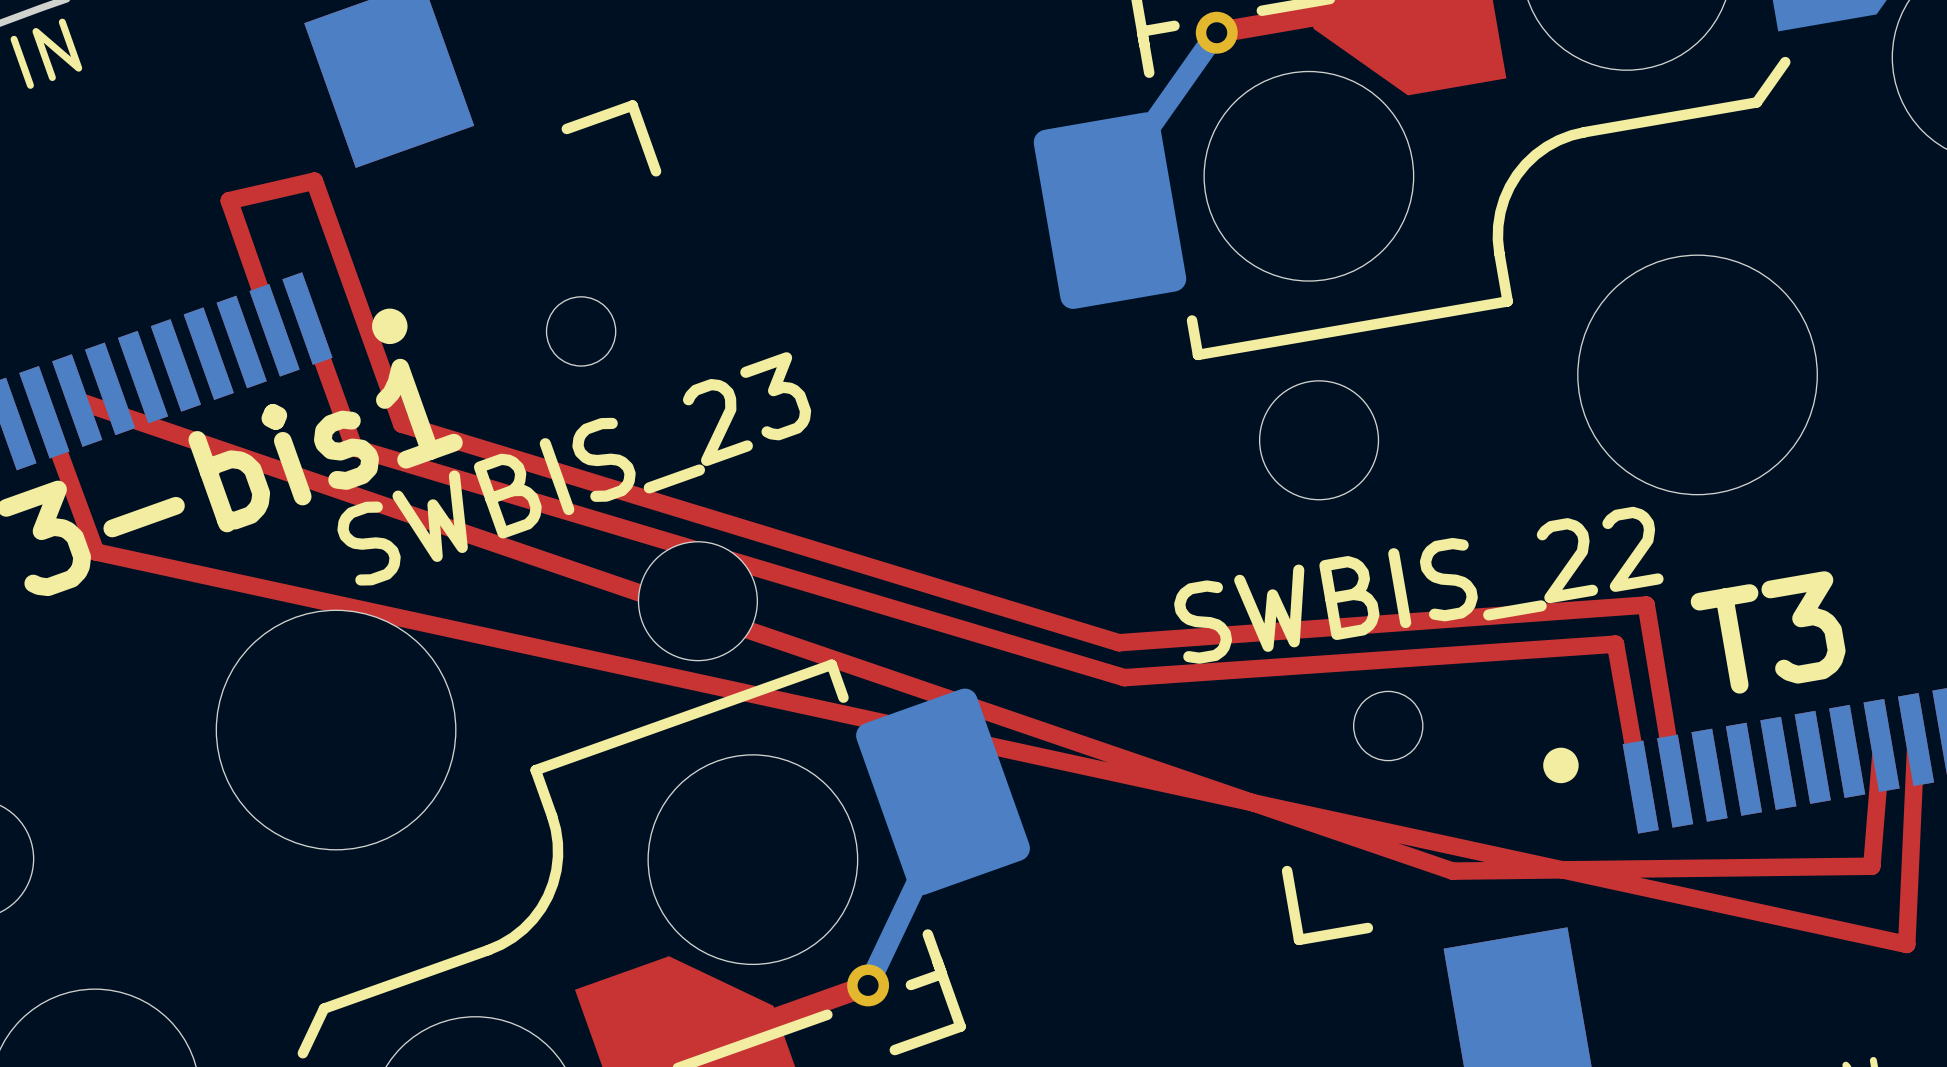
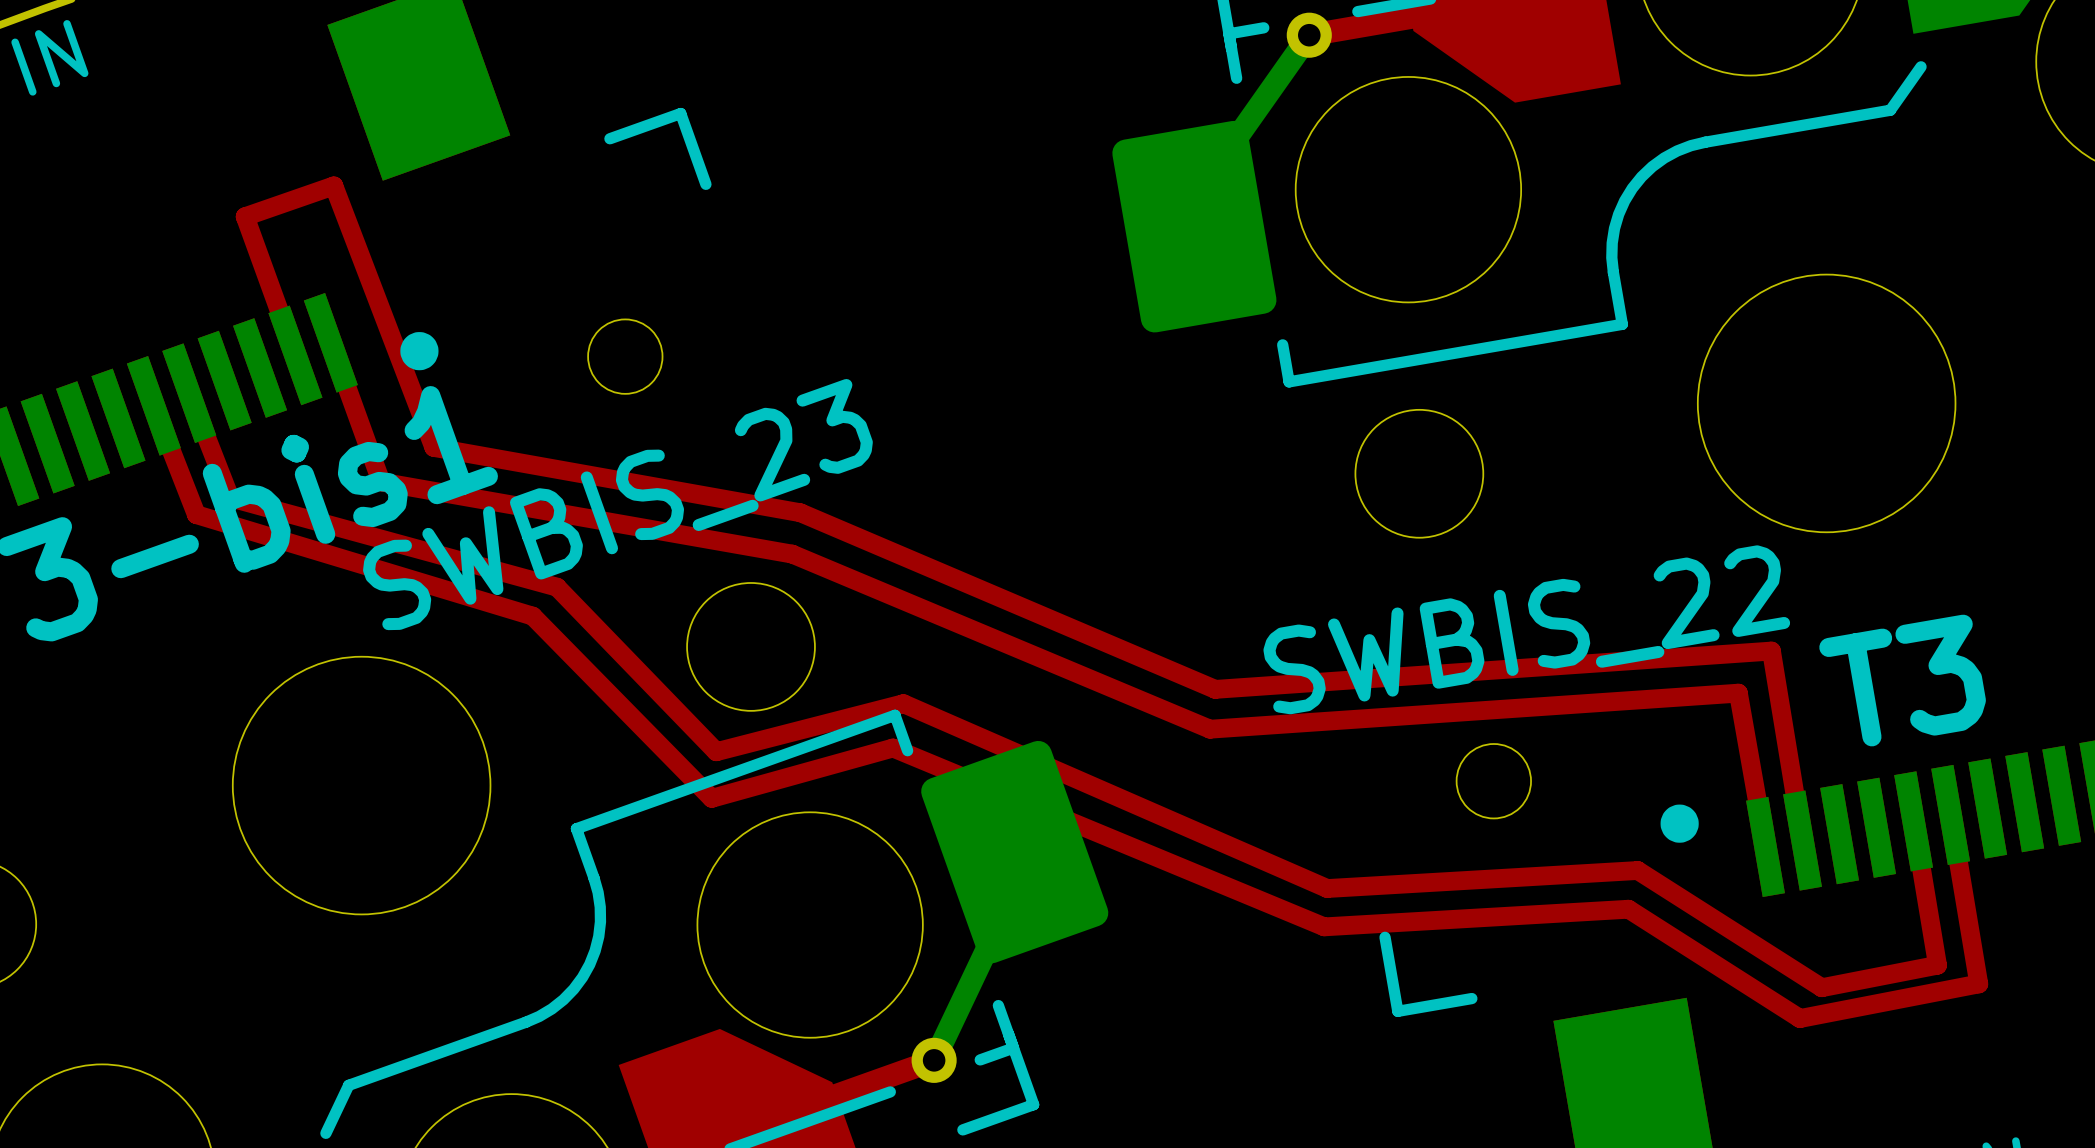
top track: (274, 330) (229, 200) (314, 181) (401, 424) (1118, 642) (1646, 605) -> (295, 355) (245, 216) (333, 185) (433, 447) (800, 512) (1215, 689) (1771, 651)
top track: none -> (189, 393) (230, 497) (557, 587) (716, 751) (903, 703) (1327, 888) (1637, 870) (1821, 987) (1937, 965) (1913, 821)
top track: none -> (153, 405) (196, 514) (532, 616) (711, 798) (892, 748) (1324, 926) (1628, 909) (1800, 1018) (1978, 983) (1950, 814)
top track: (77, 400) (1452, 871) (1871, 866) (1881, 745) -> none
top track: (44, 412) (95, 551) (1906, 944) (1916, 739) -> none
top track: (354, 447) (1124, 677) -> (381, 481) (792, 554) (1210, 729)

